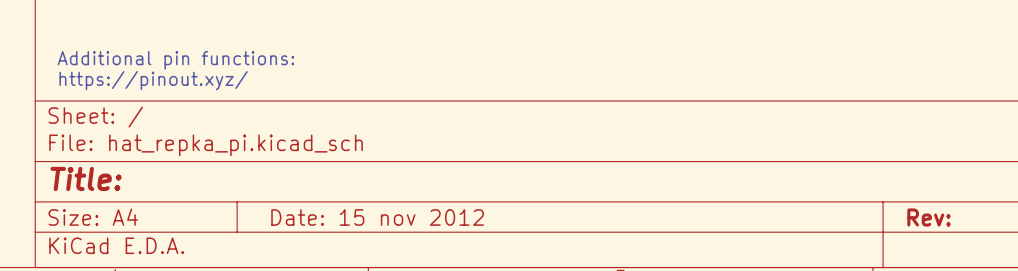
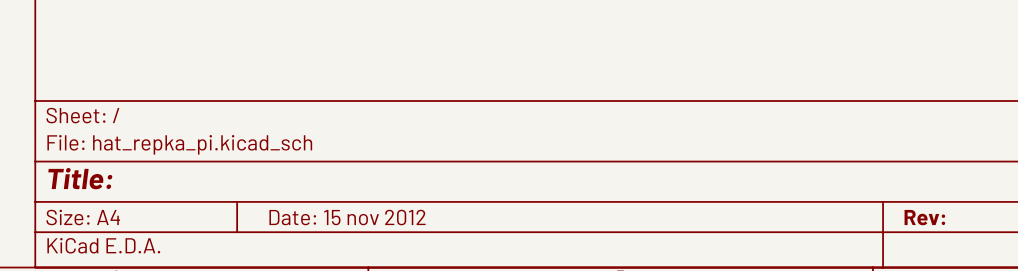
text: Additional pin functions: (175, 60) -> none
text: https://pinout.xyz/ (153, 80) -> none

